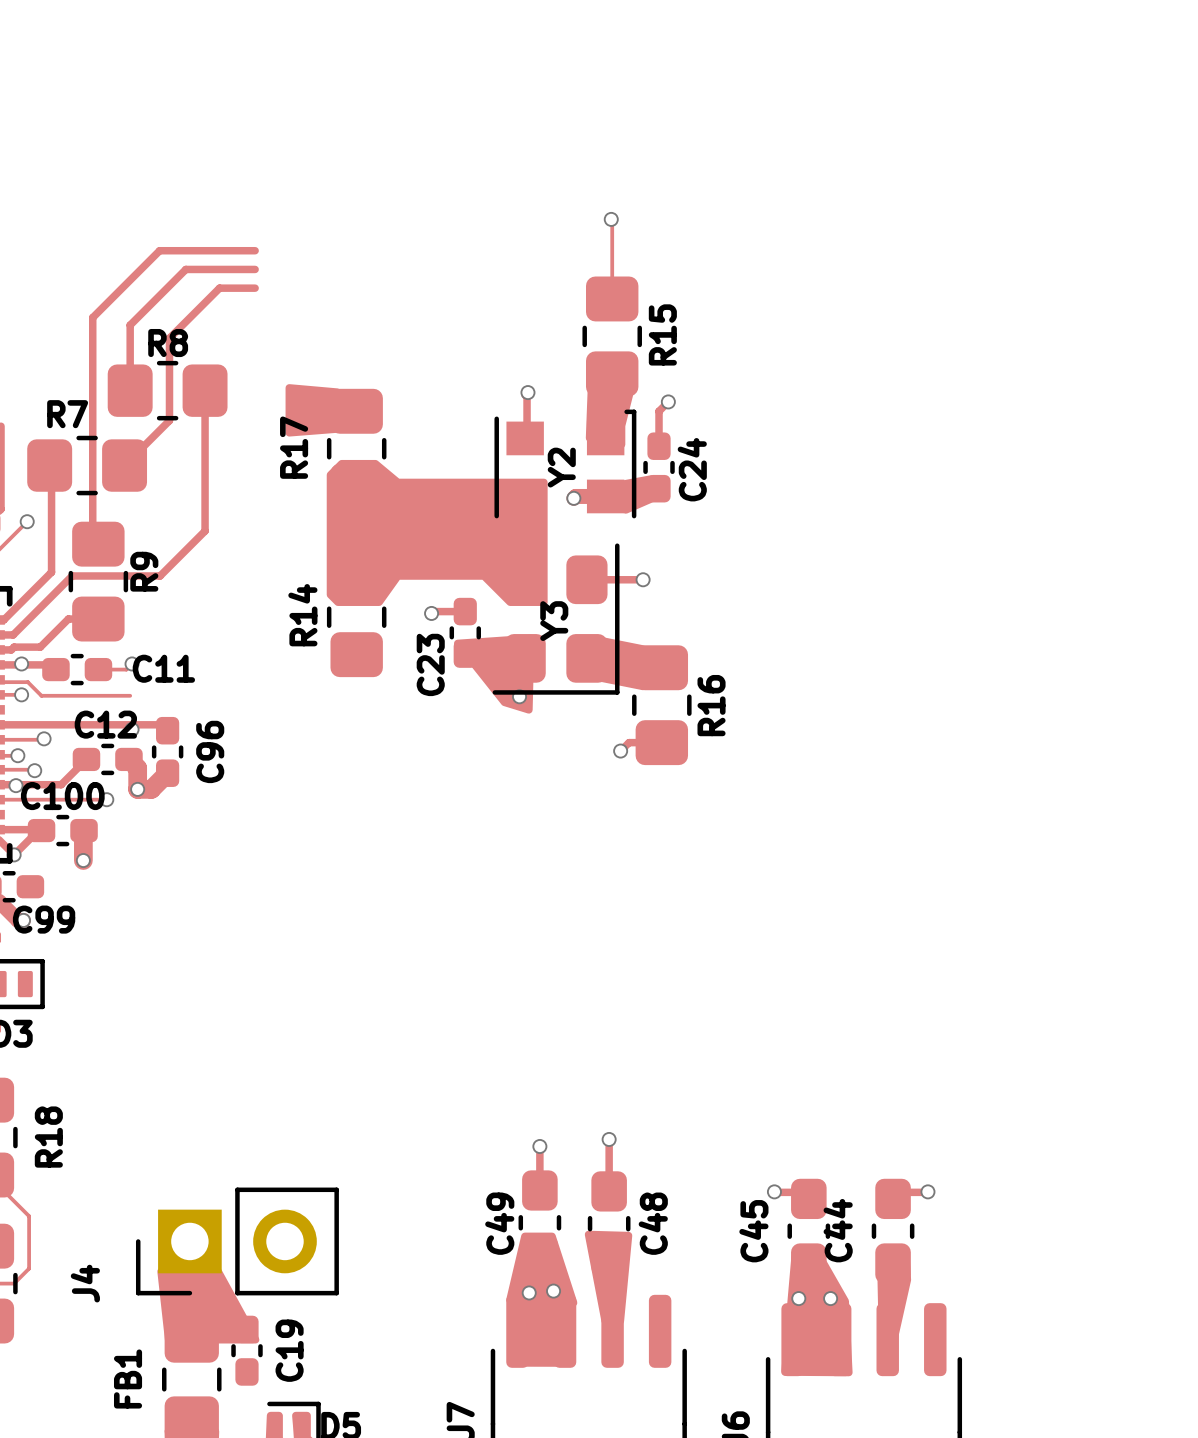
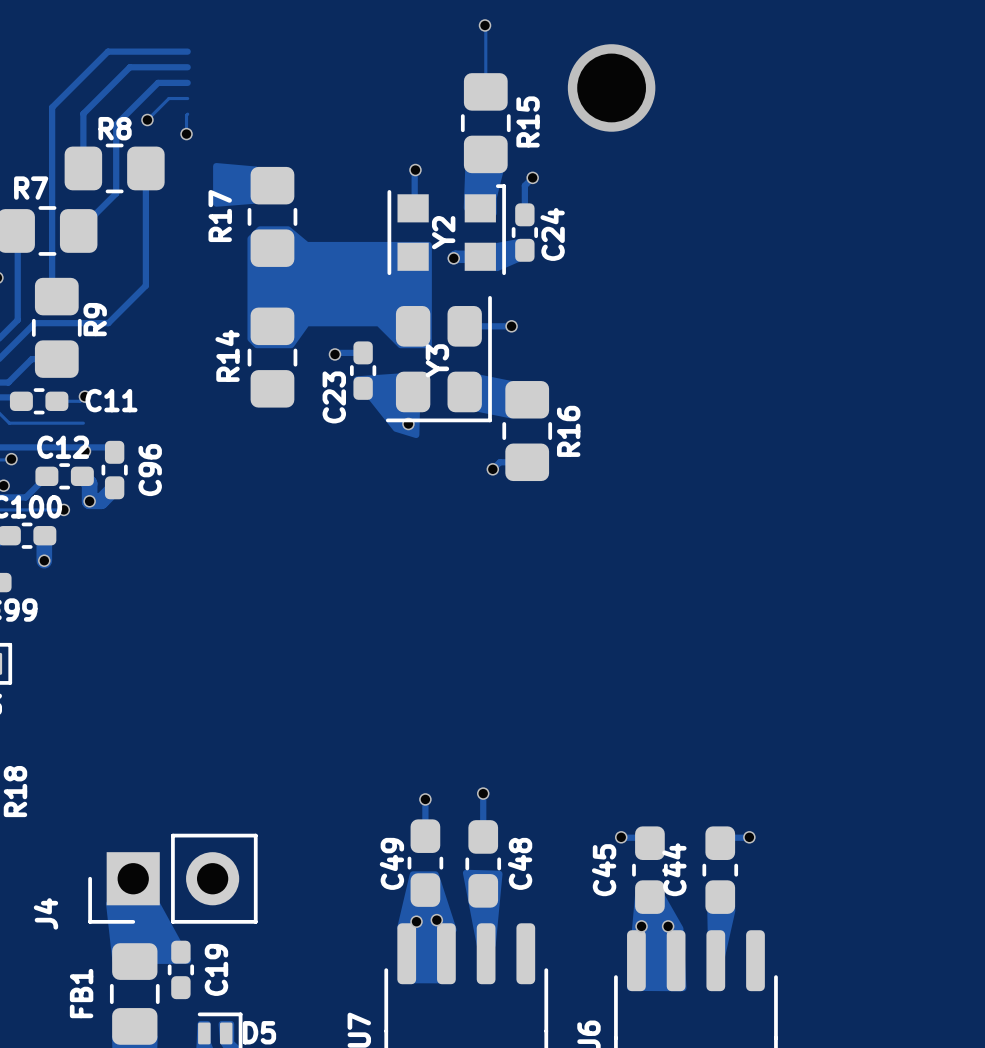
via: none -> (611, 87)
track: none -> (187, 98) (168, 98) (147, 120)
track: none -> (187, 114) (186, 134)
via: none -> (147, 120)
via: none -> (186, 134)

